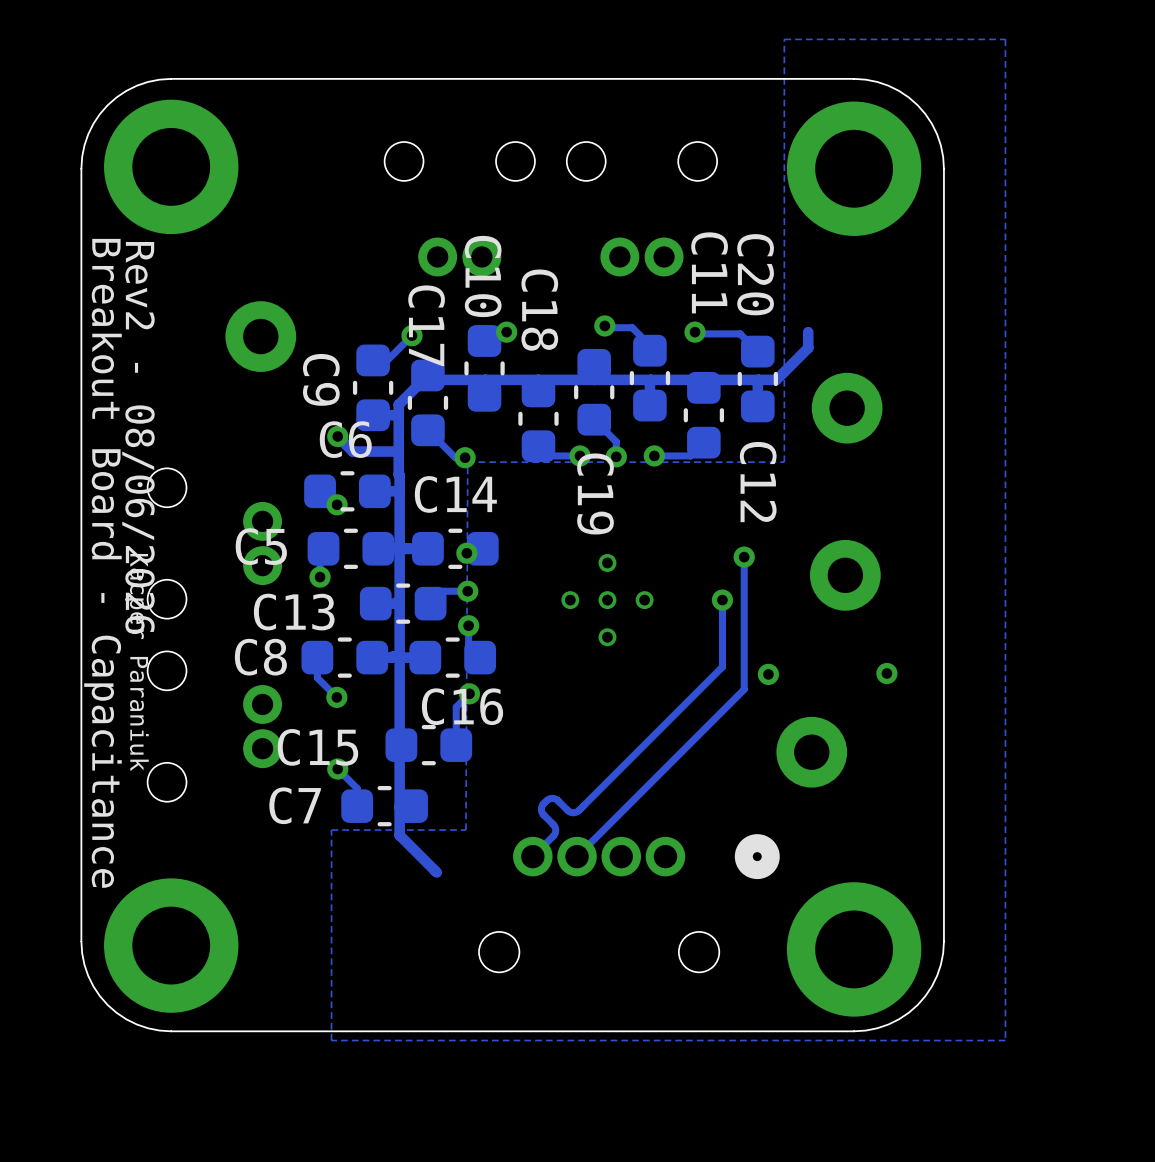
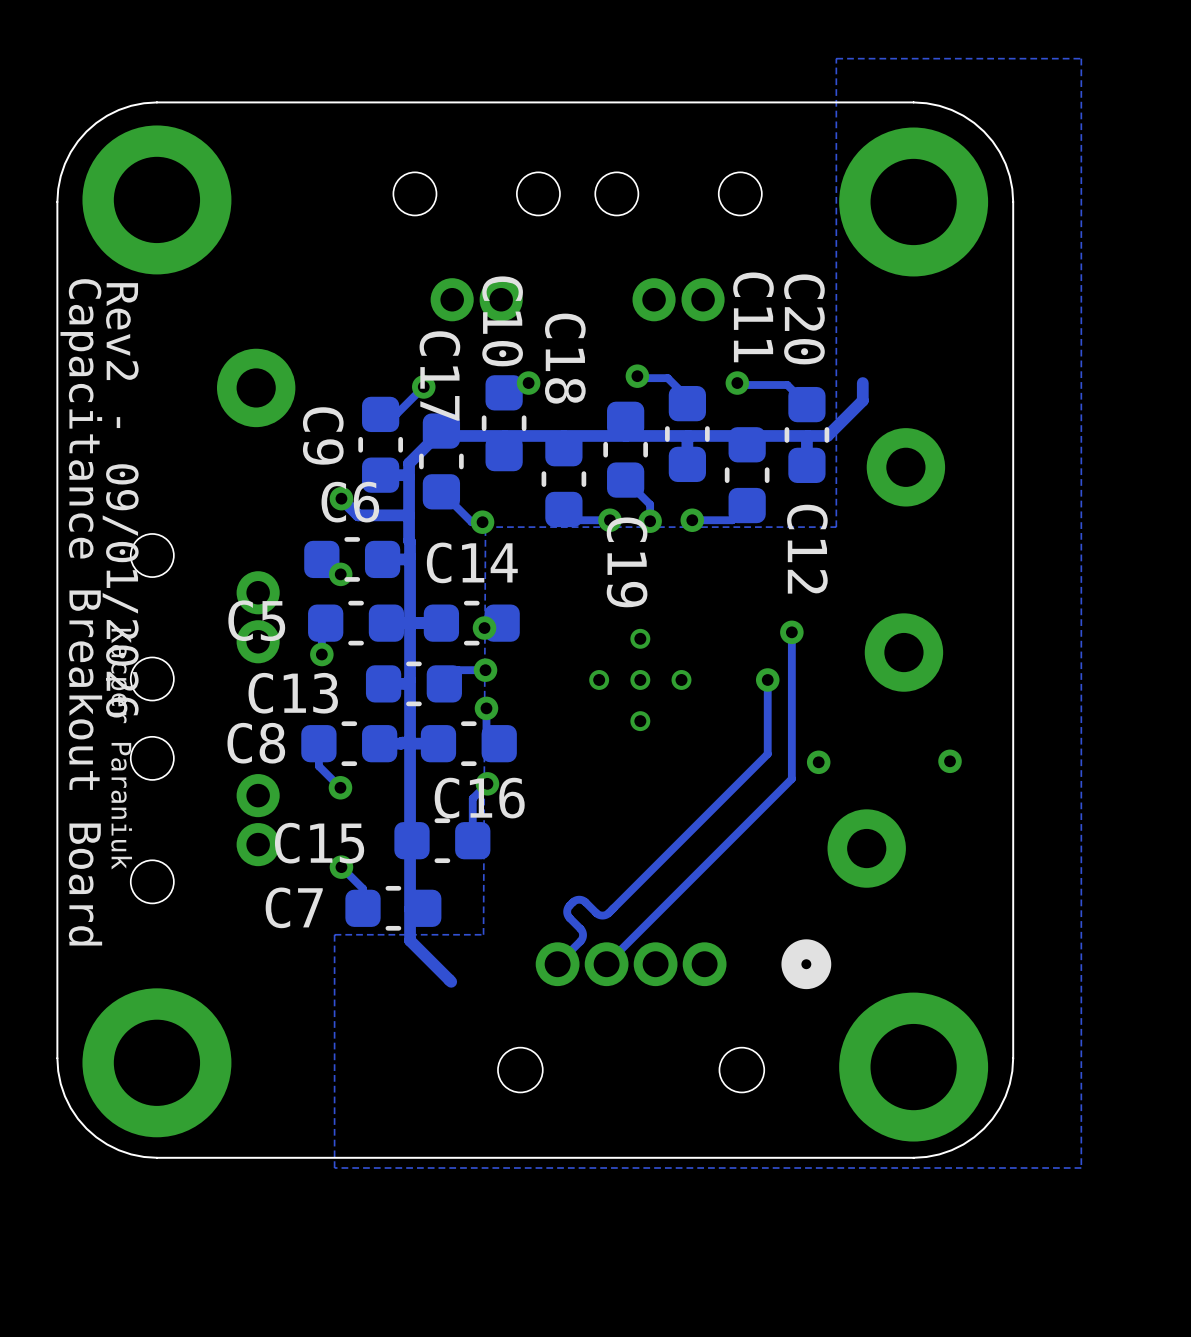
text: Rev2 - 08/06/2026 (138, 438) -> Rev2 - 09/01/2026 (120, 500)
text: Breakout Board - Capacitance (102, 563) -> Capacitance Breakout Board (81, 612)

